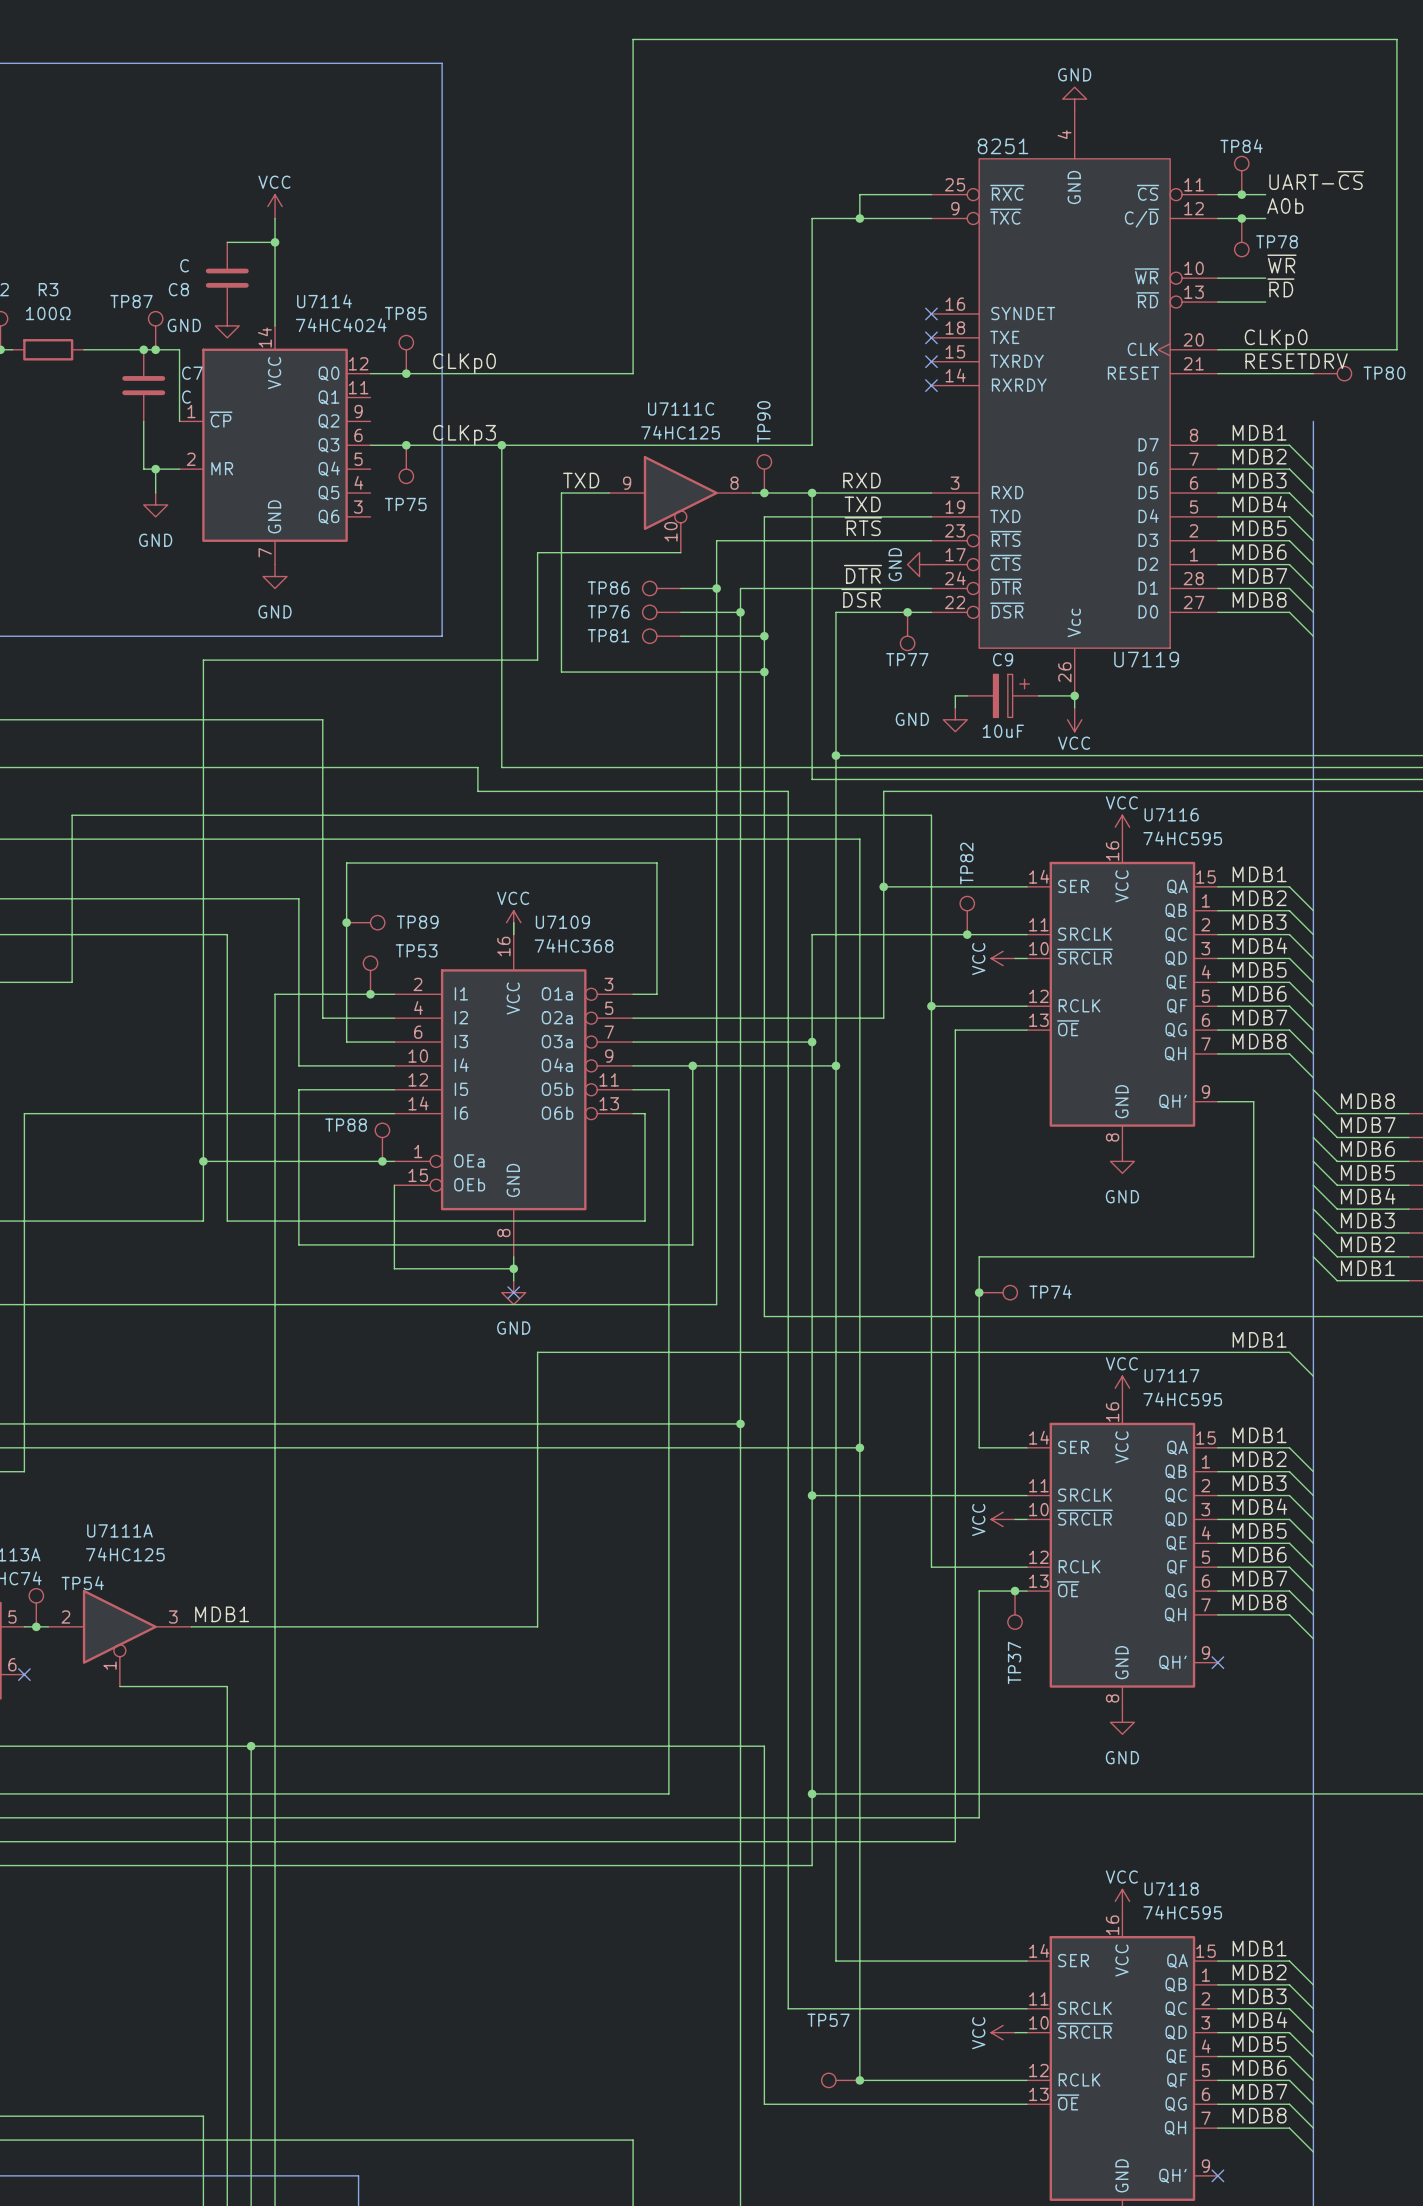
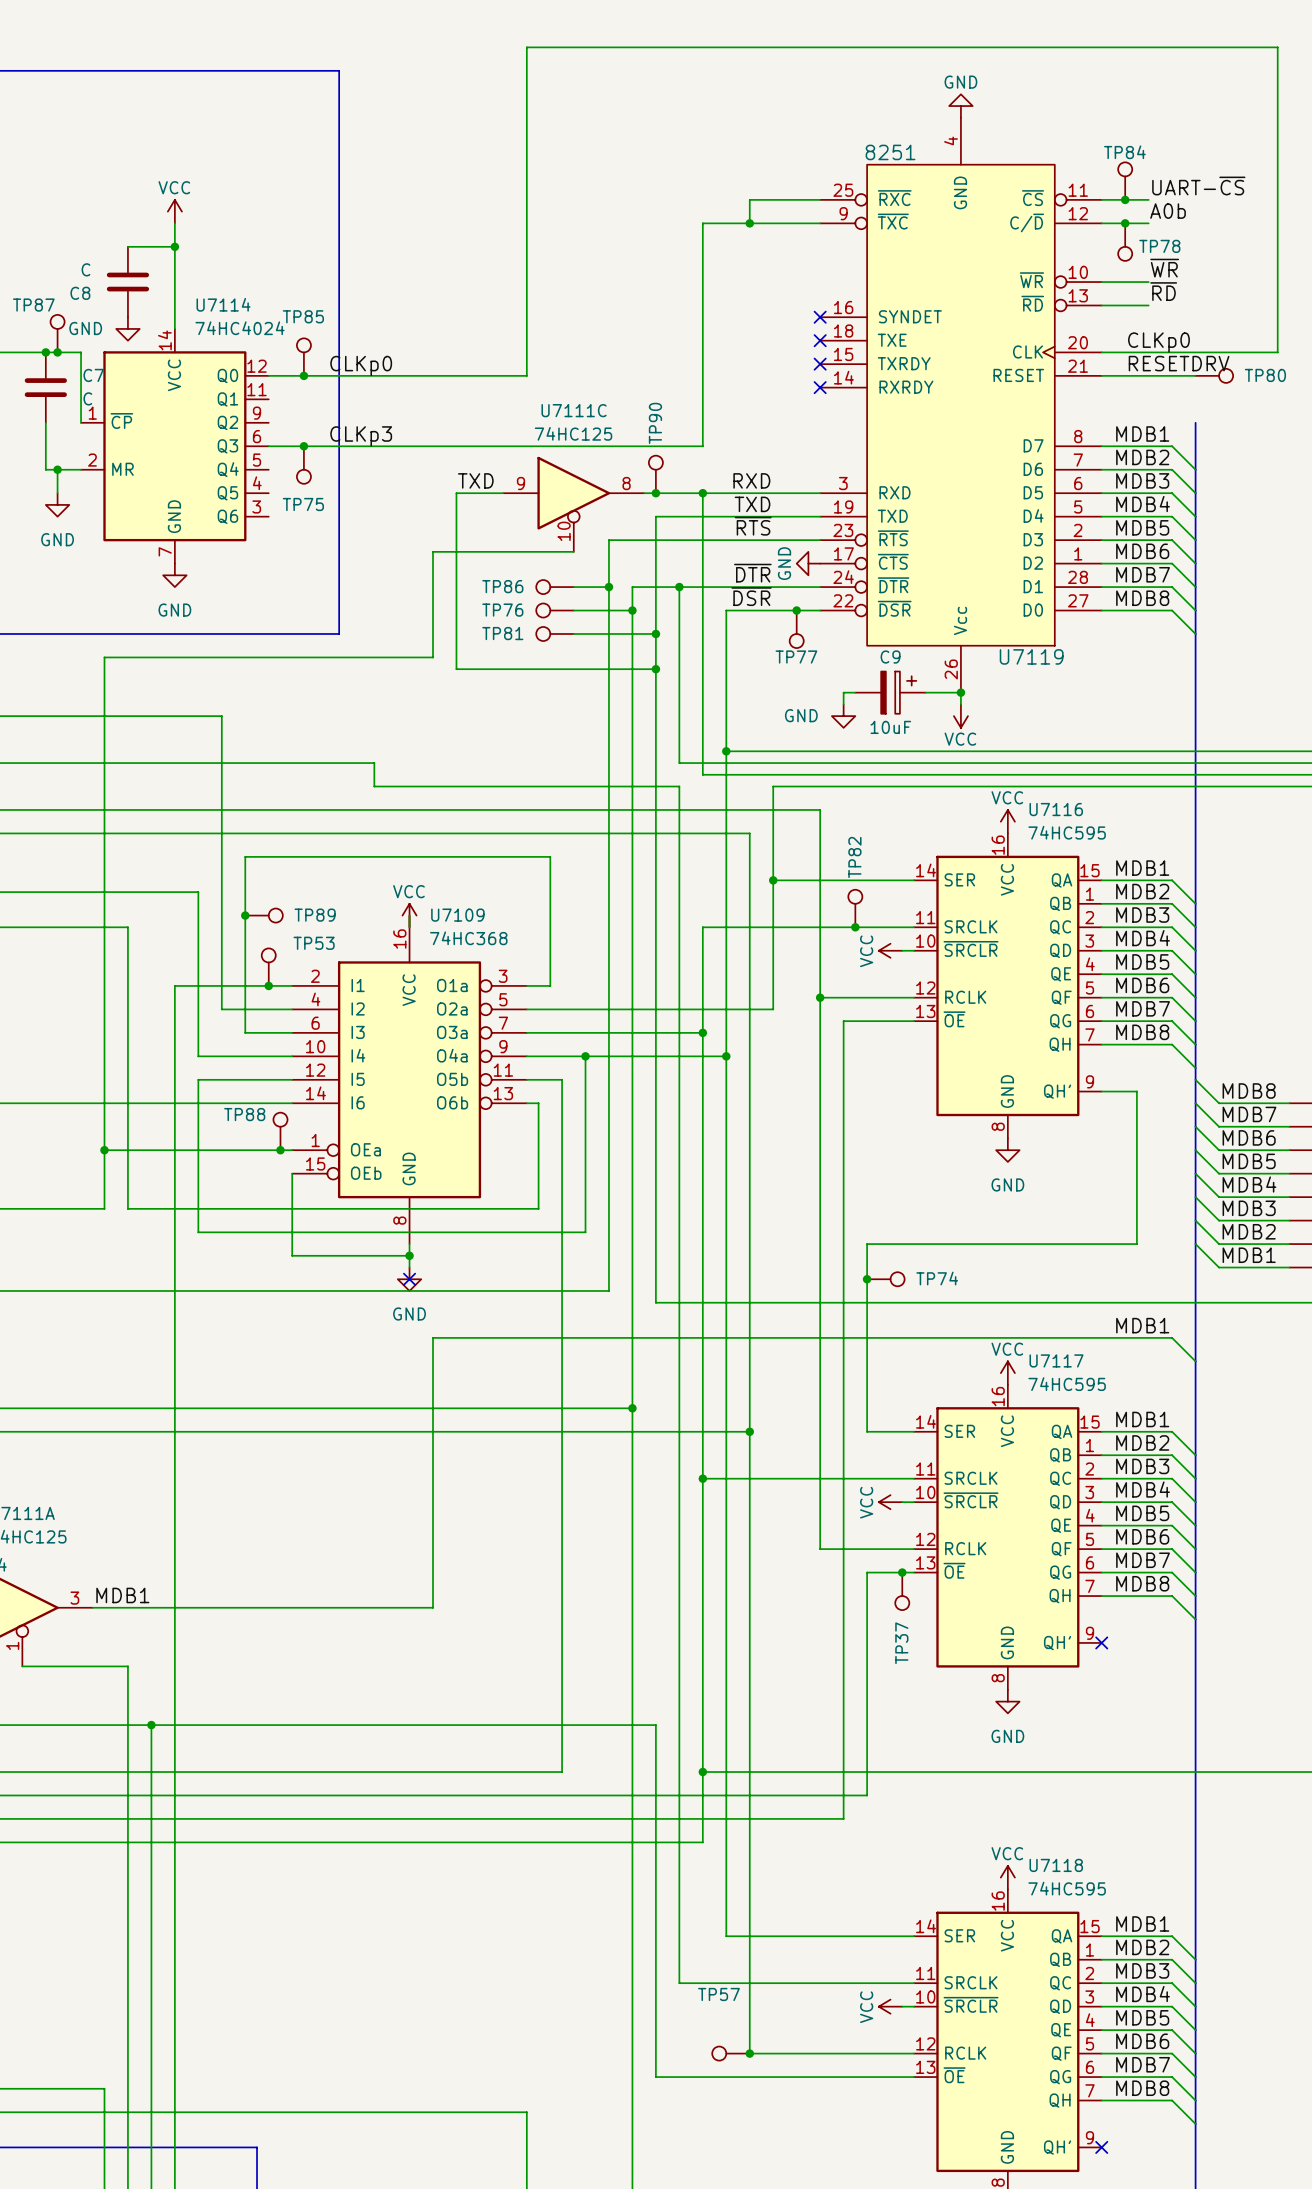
wire: (501, 445) (501, 767) (788, 767) -> (679, 587) (679, 763)
junction: (501, 445) -> none
junction: none -> (679, 587)

